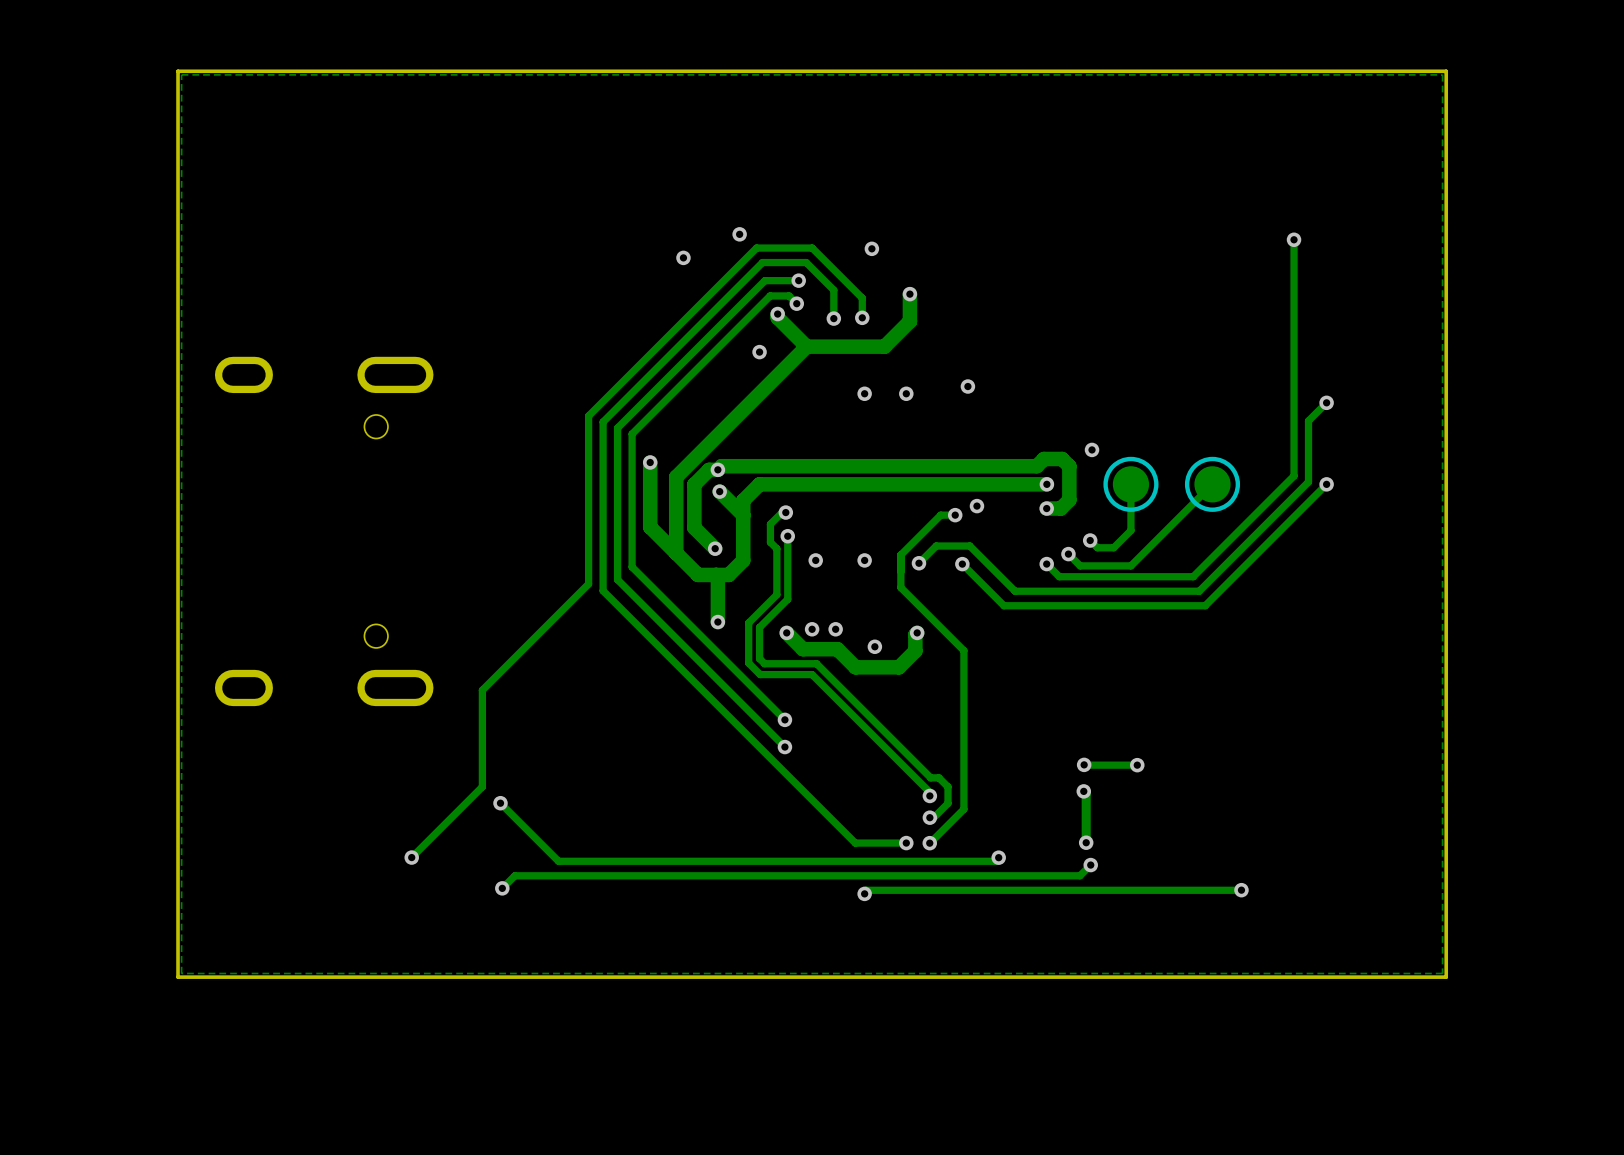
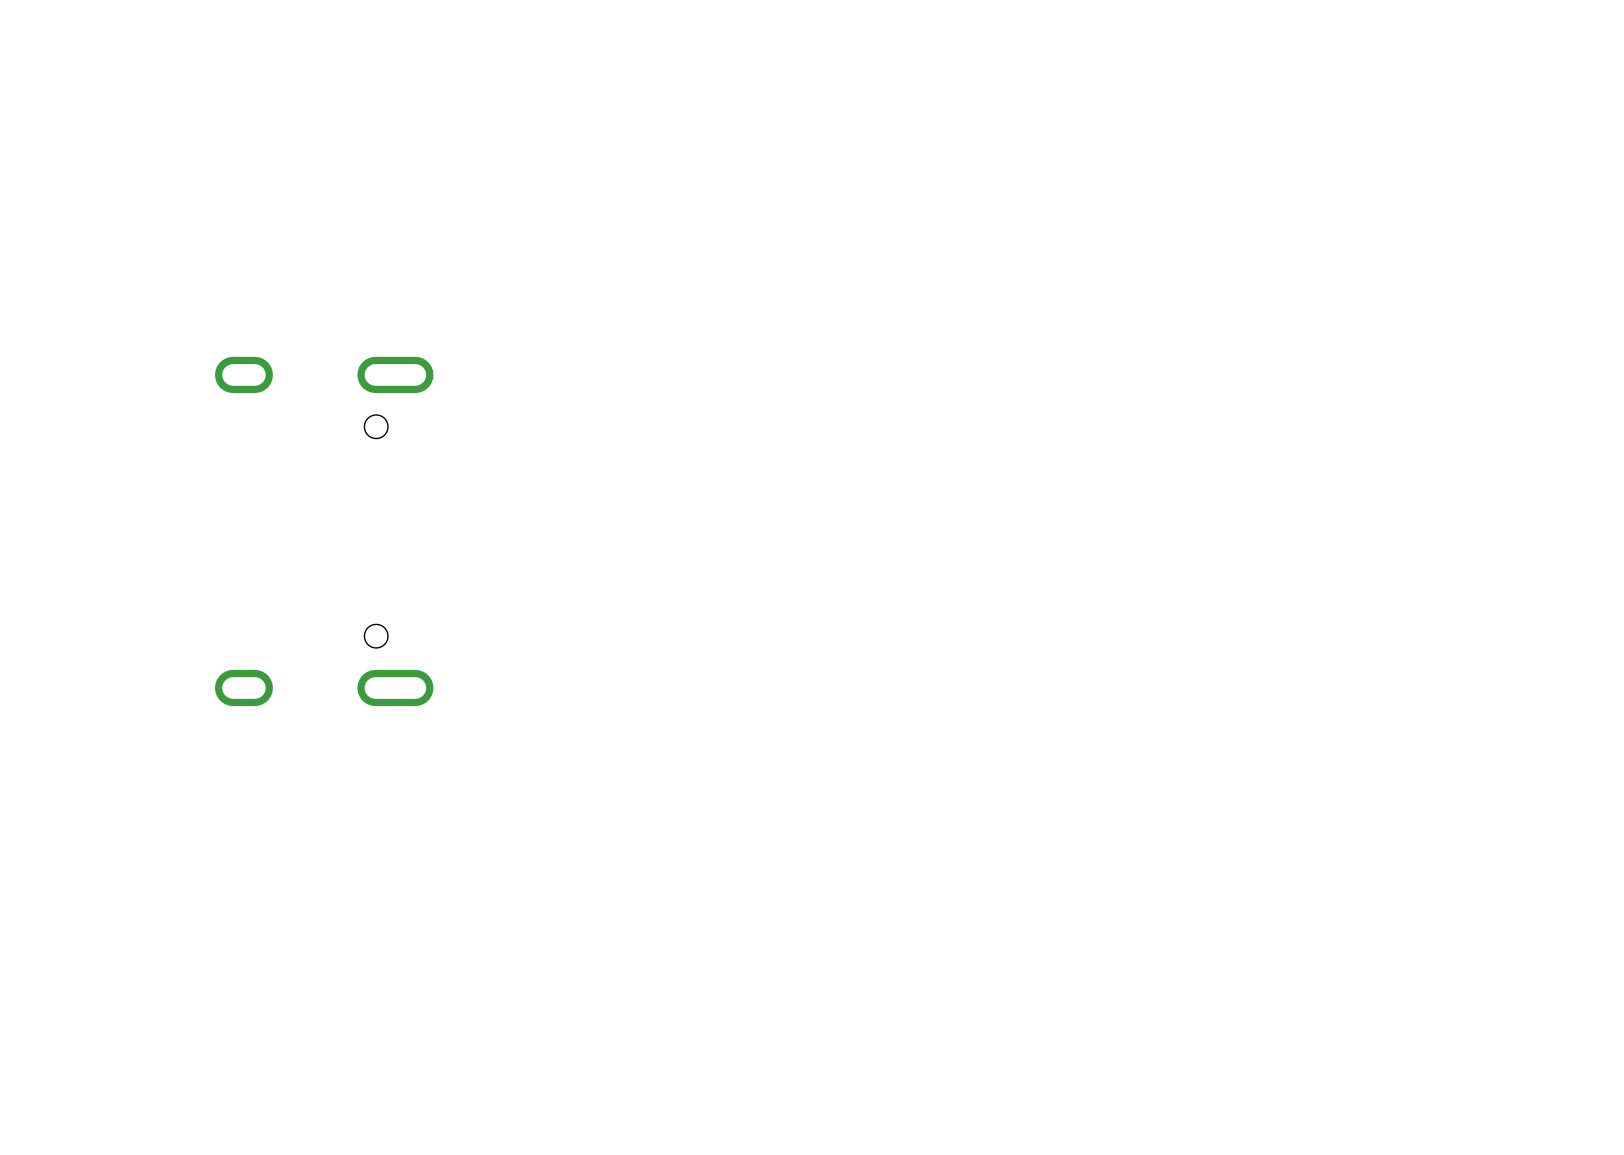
board edge: (1446, 71) (178, 71) (178, 977) (1446, 977) (1446, 71) -> none
zone outline: (1442, 74) (1442, 973) (181, 973) (181, 74) (1442, 74) -> none
via: (739, 234) -> none
track: (1294, 239) (1294, 475) (1193, 576) (1059, 576) (1046, 564) -> none
via: (1294, 239) -> none
via: (871, 248) -> none
via: (683, 257) -> none
track: (798, 280) (764, 280) (617, 428) (617, 579) (784, 747) -> none
via: (798, 280) -> none
track: (909, 294) (909, 321) (884, 346) (806, 346) -> none
via: (909, 294) -> none
track: (796, 303) (789, 295) (770, 295) (632, 434) (632, 567) (784, 719) -> none
via: (796, 303) -> none
track: (777, 314) (777, 317) (806, 346) -> none
via: (777, 314) -> none
track: (862, 317) (862, 298) (812, 248) (756, 248) (588, 416) (588, 583) (482, 690) (482, 786) (411, 857) -> none
via: (862, 317) -> none
track: (833, 318) (833, 290) (806, 262) (762, 262) (603, 422) (603, 590) (855, 843) (906, 843) -> none
via: (833, 318) -> none
track: (806, 346) (676, 477) (676, 553) -> none
via: (759, 352) -> none
via: (967, 386) -> none
via: (864, 393) -> none
via: (906, 393) -> none
track: (1326, 402) (1308, 420) (1308, 481) (1199, 591) (1015, 591) (969, 546) (936, 546) (918, 563) -> none
via: (1326, 402) -> none
via: (1092, 449) -> none
track: (650, 462) (650, 527) (697, 574) (728, 574) (743, 560) (743, 500) (759, 484) (1046, 484) -> none
via: (650, 462) -> none
via: (717, 469) -> none
via: (1046, 484) -> none
track: (1130, 484) (1130, 530) (1113, 547) (1097, 547) (1090, 540) -> none
part: (1130, 484) -> none
track: (1212, 484) (1130, 565) (1080, 565) (1068, 554) -> none
part: (1212, 484) -> none
track: (1326, 484) (1205, 605) (1003, 605) (962, 564) -> none
via: (1326, 484) -> none
track: (719, 491) (743, 515) -> none
via: (719, 491) -> none
via: (976, 506) -> none
track: (1046, 508) (1060, 508) (1069, 500) (1069, 466) (1062, 458) (1044, 458) (1036, 466) (721, 466) (717, 469) (709, 469) (694, 484) (694, 527) (715, 548) -> none
via: (1046, 508) -> none
track: (785, 512) (782, 512) (770, 524) (770, 542) (776, 548) (776, 594) (748, 622) (748, 663) (760, 674) (812, 674) (929, 792) (929, 795) -> none
via: (785, 512) -> none
track: (955, 515) (940, 515) (900, 555) (900, 587) (963, 650) (963, 809) (929, 843) -> none
via: (955, 515) -> none
track: (787, 536) (787, 599) (759, 627) (759, 658) (764, 663) (816, 663) (930, 777) (938, 777) (947, 786) (947, 803) (933, 817) (929, 817) -> none
via: (787, 536) -> none
via: (1090, 540) -> none
via: (715, 548) -> none
via: (1068, 554) -> none
via: (815, 560) -> none
via: (864, 560) -> none
via: (918, 563) -> none
via: (962, 564) -> none
via: (1046, 564) -> none
track: (716, 574) (717, 576) (717, 622) -> none
via: (717, 622) -> none
via: (812, 629) -> none
via: (835, 629) -> none
via: (786, 632) -> none
track: (917, 632) (915, 634) (915, 651) (899, 667) (855, 667) (837, 649) (803, 649) (786, 632) -> none
via: (917, 632) -> none
via: (874, 646) -> none
via: (784, 719) -> none
via: (784, 747) -> none
via: (1084, 764) -> none
track: (1137, 765) (1084, 765) -> none
via: (1137, 765) -> none
track: (1083, 791) (1086, 793) (1086, 842) -> none
via: (1083, 791) -> none
via: (929, 795) -> none
track: (500, 803) (558, 861) (995, 861) (998, 857) -> none
via: (500, 803) -> none
via: (929, 817) -> none
via: (1086, 842) -> none
via: (906, 843) -> none
via: (929, 843) -> none
via: (411, 857) -> none
via: (998, 857) -> none
track: (1090, 865) (1080, 875) (514, 875) (502, 888) -> none
via: (1090, 865) -> none
via: (502, 888) -> none
track: (1241, 890) (866, 890) (864, 893) -> none
via: (1241, 890) -> none
via: (864, 893) -> none

